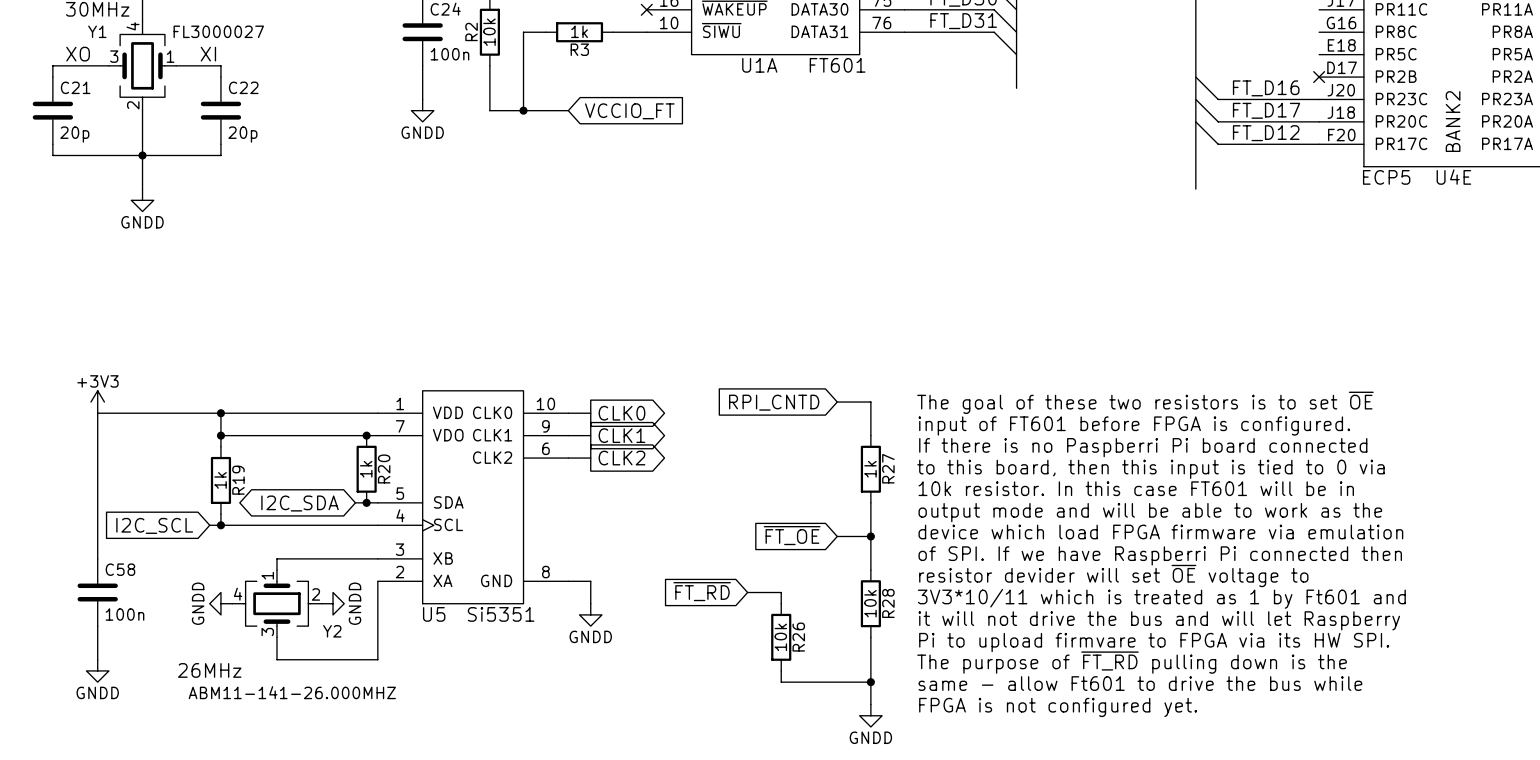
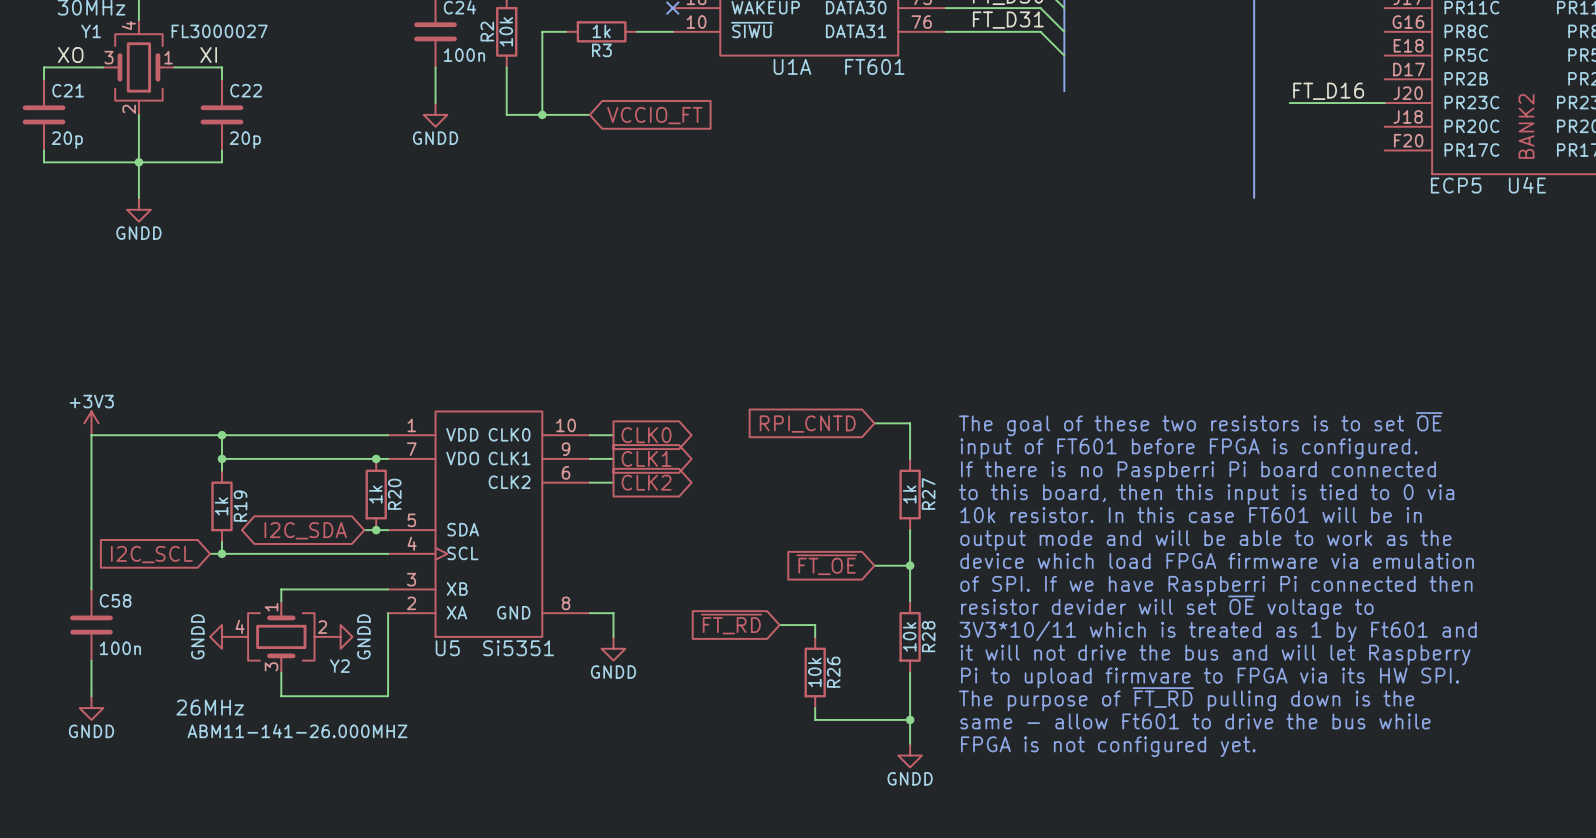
wire: (1195, 77) (1218, 99) (1229, 99) -> none
no-connect mark: (1319, 77) -> none
wire: (1195, 99) (1218, 121) (1319, 121) -> none
label: FT_D17 (1266, 110) -> none
wire: (1195, 121) (1218, 144) (1319, 144) -> none
label: FT_D12 (1266, 133) -> none

